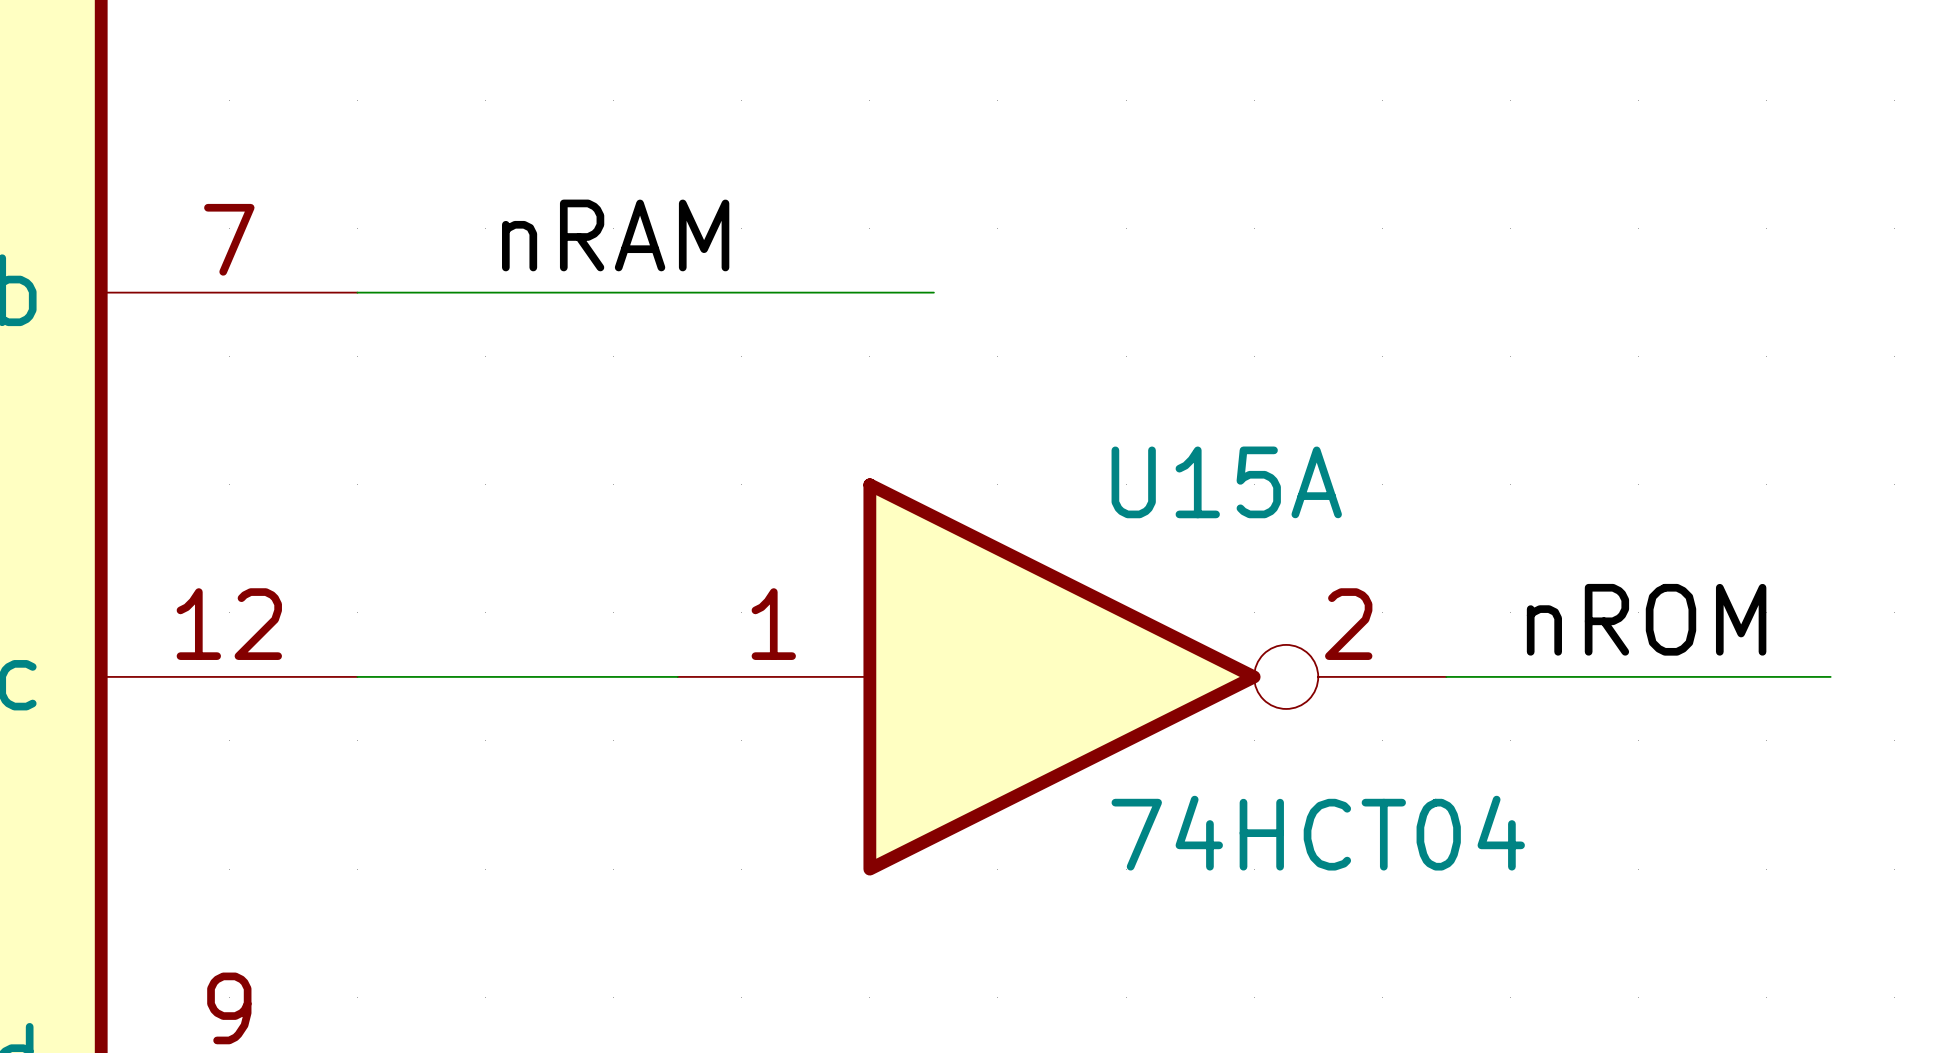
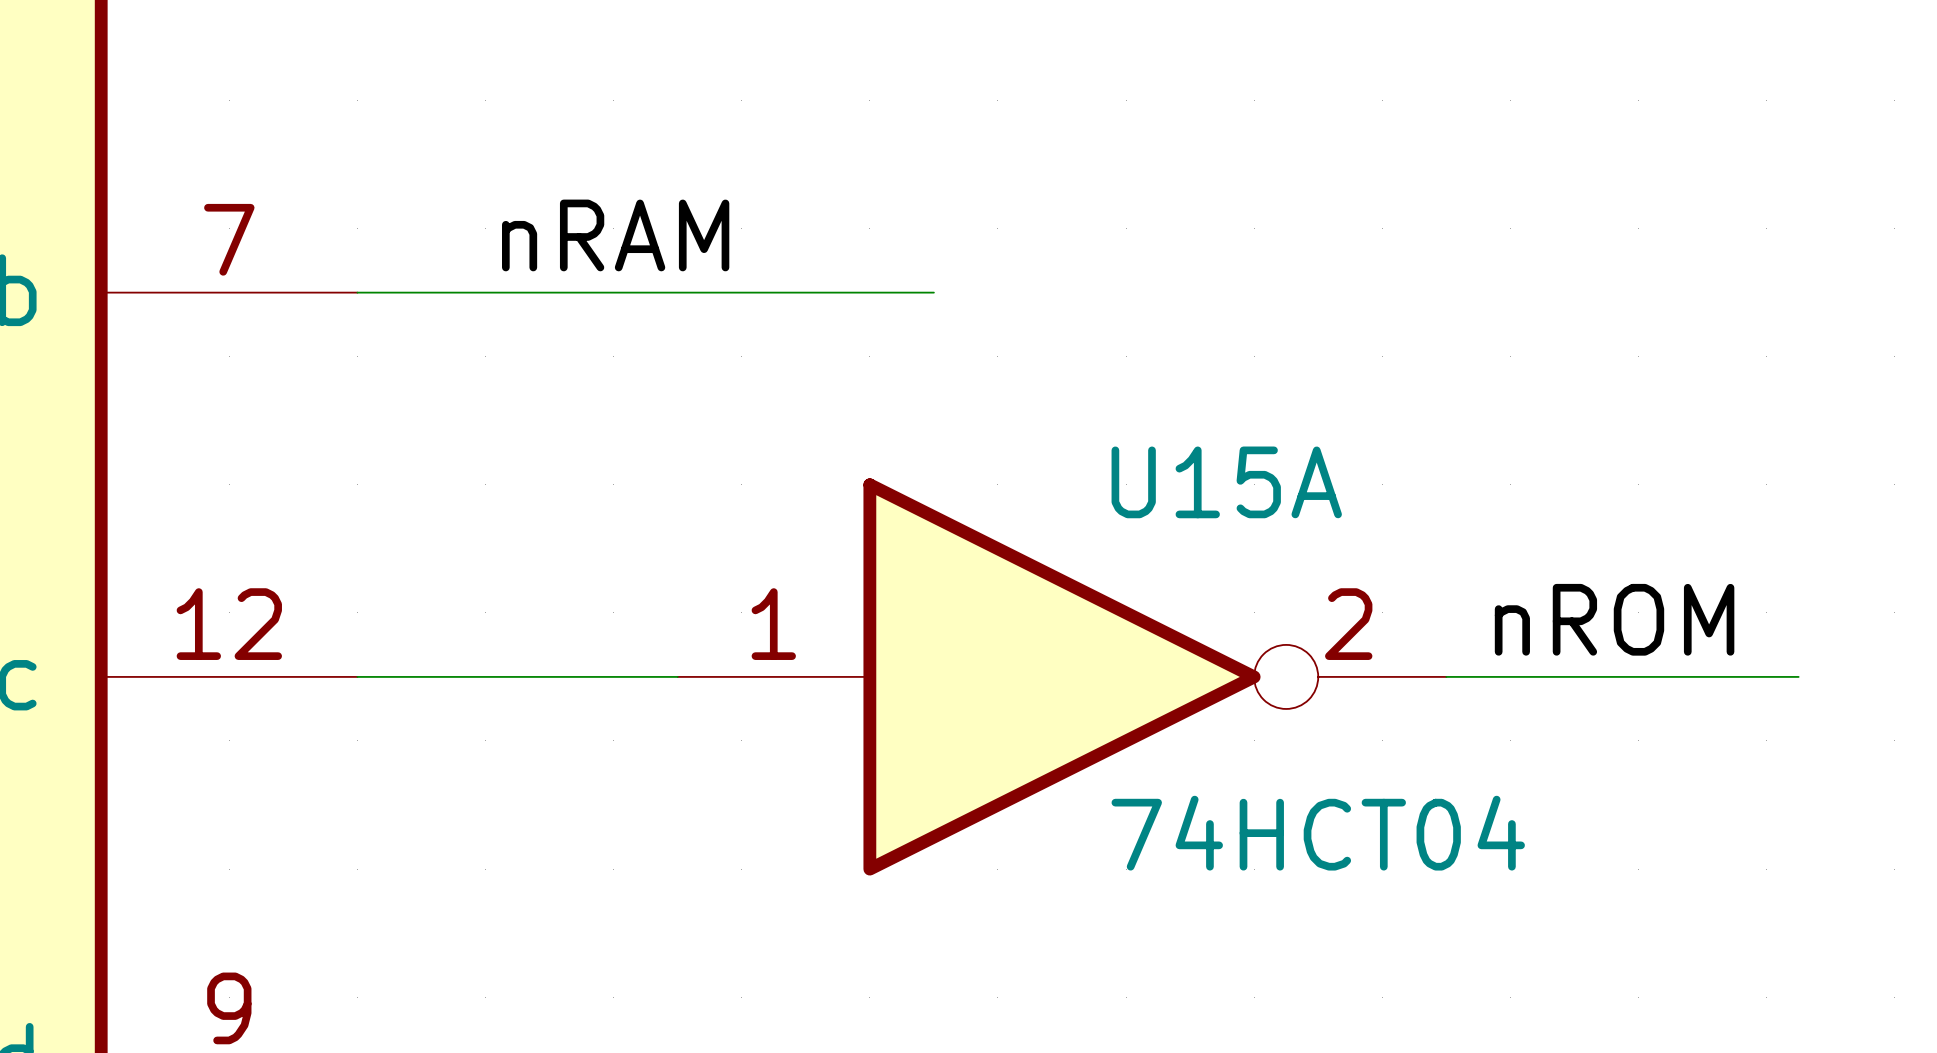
label position: nROM (1646, 619) -> nROM (1614, 619)
wire: (1798, 676) (1830, 676) -> none

